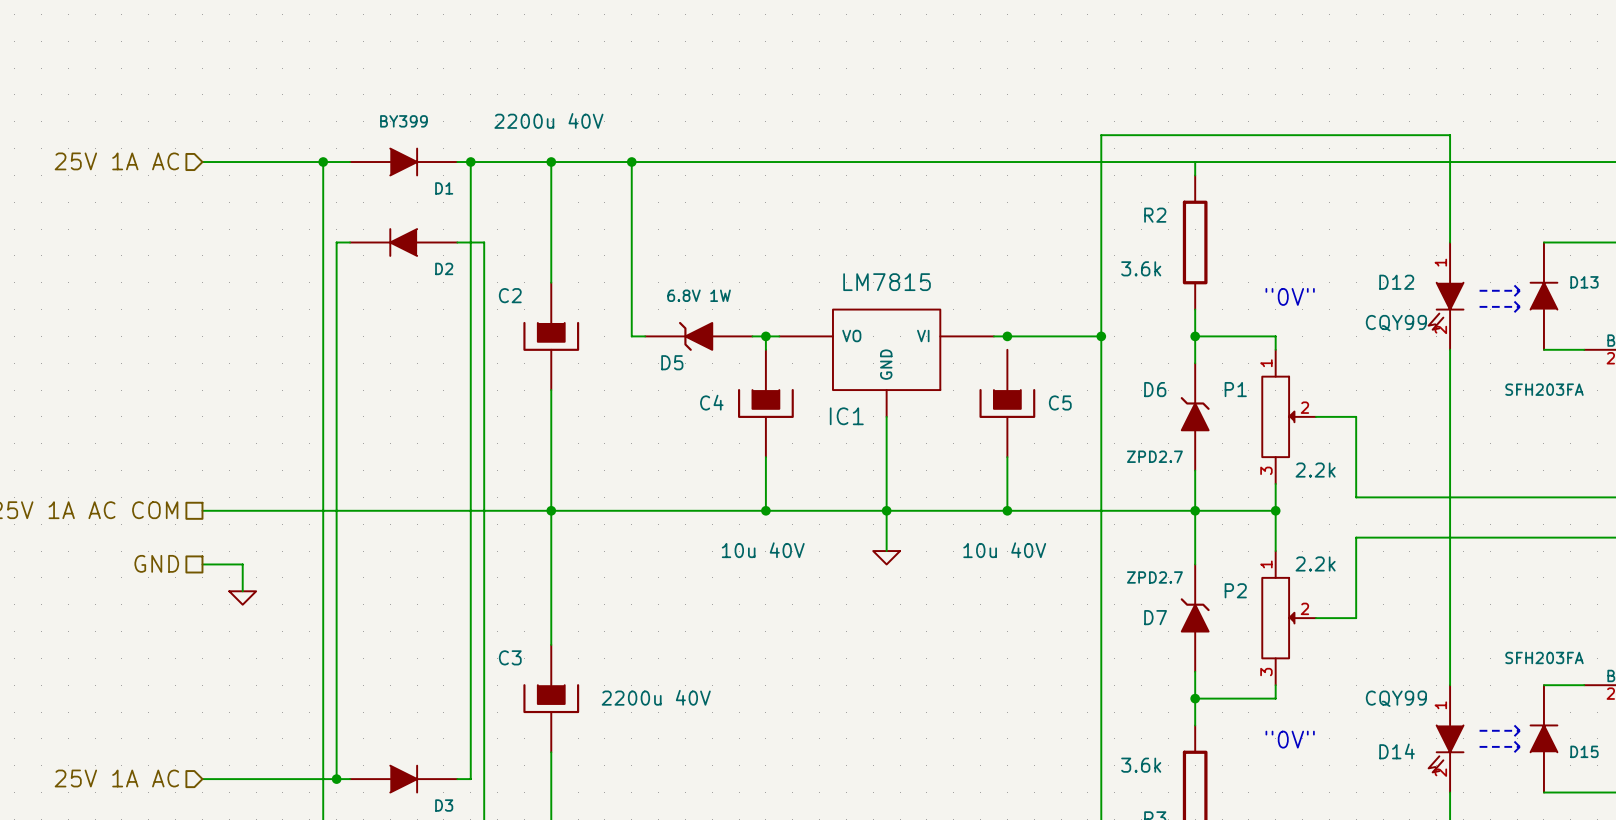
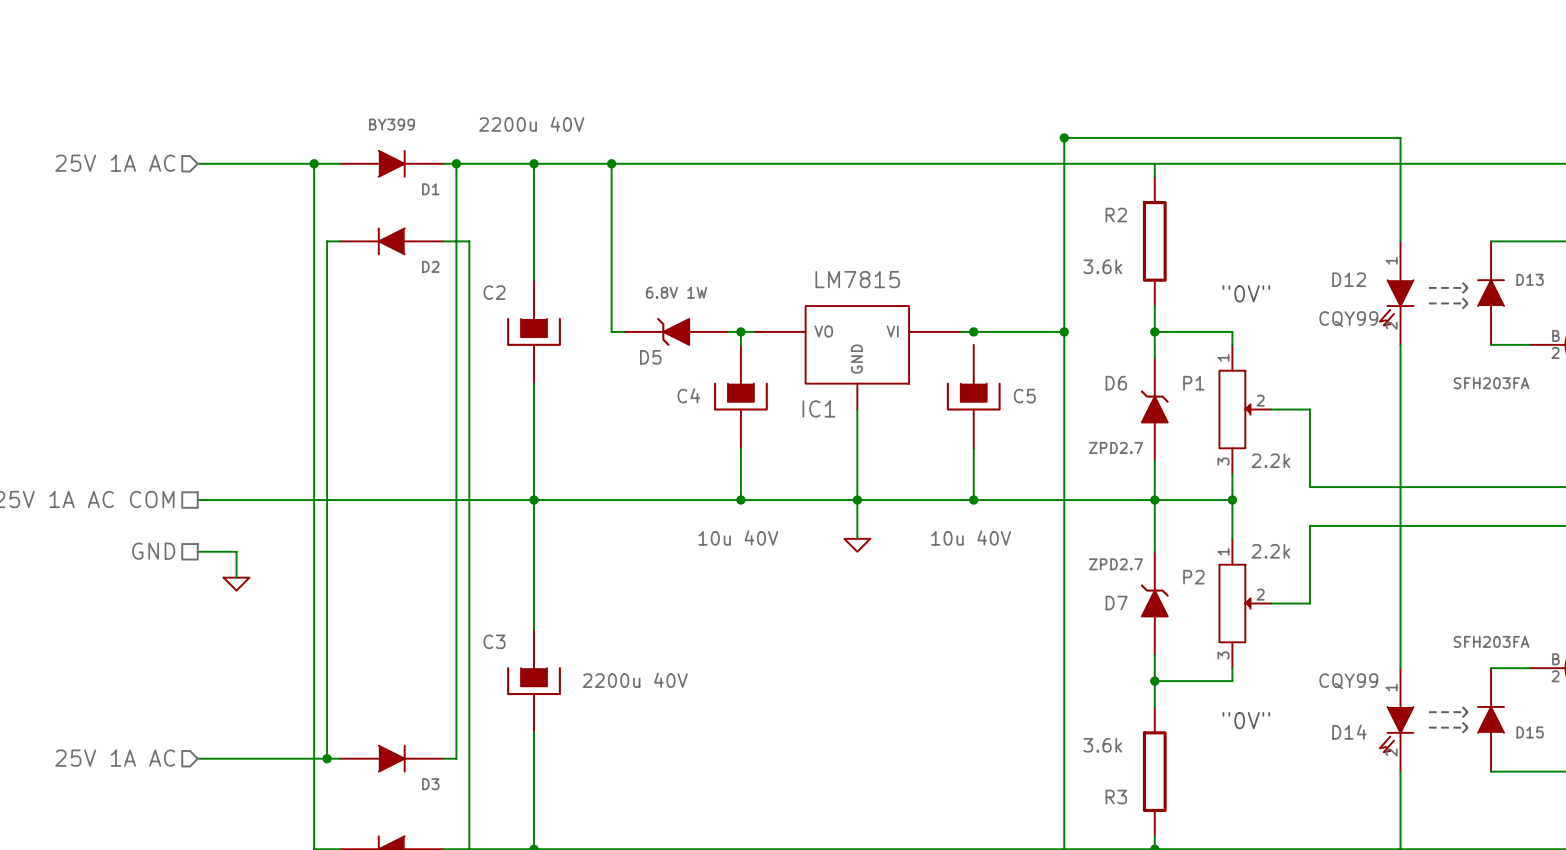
junction: none -> (1064, 137)

